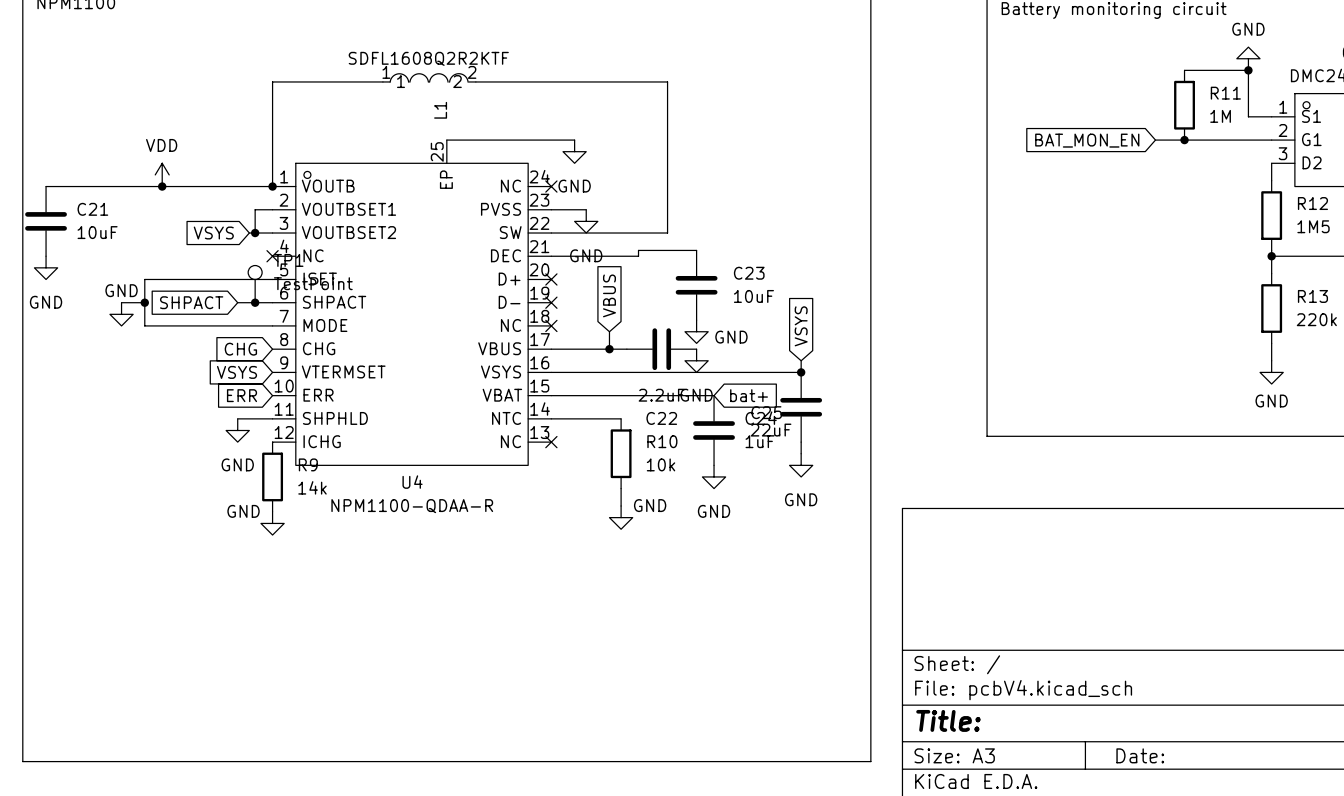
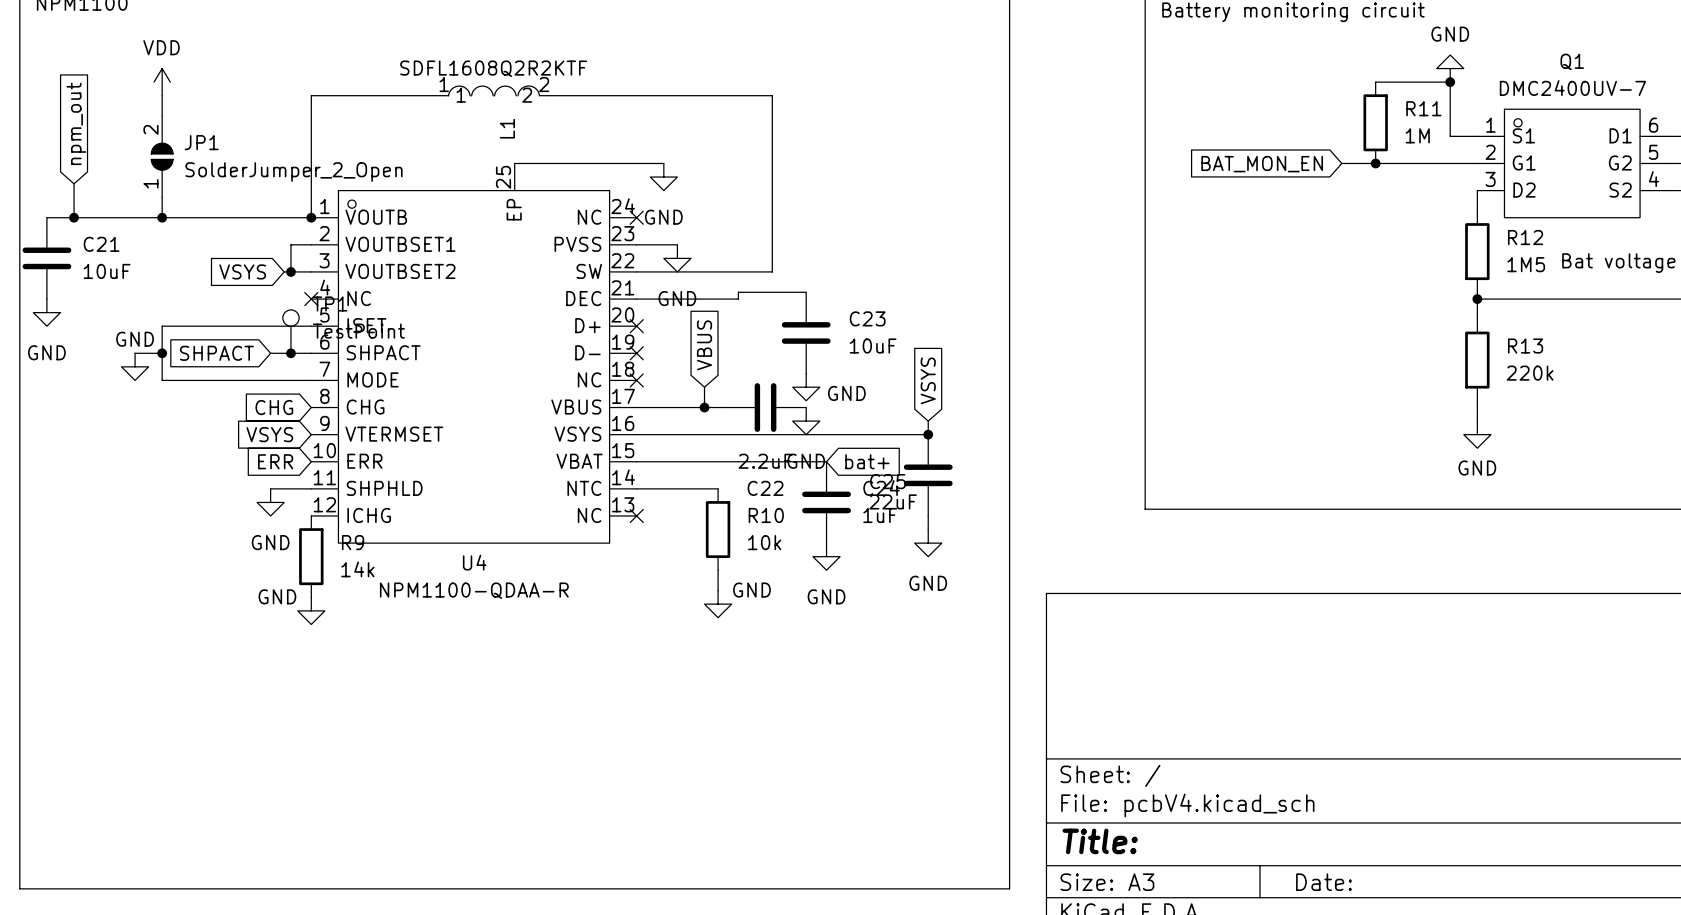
wire: none -> (162, 95) (162, 116)
global label: none -> npm_out (76, 123)
JP1: none -> SolderJumper_2_Open (162, 156)
wire: none -> (74, 183) (74, 217)
wire: none -> (162, 197) (162, 217)
power symbol position: VDD (162, 174) -> VDD (162, 82)
junction: none -> (74, 217)
junction position: (162, 186) -> (162, 217)

